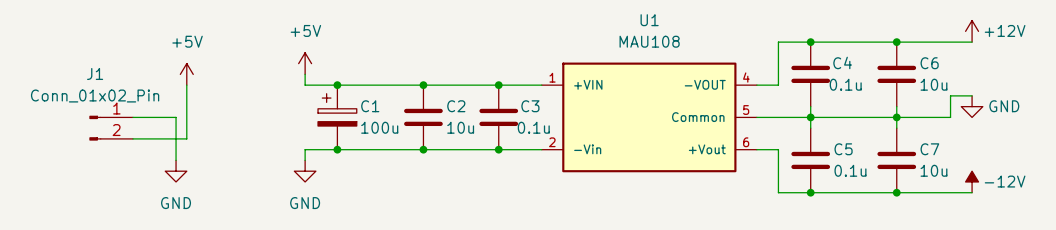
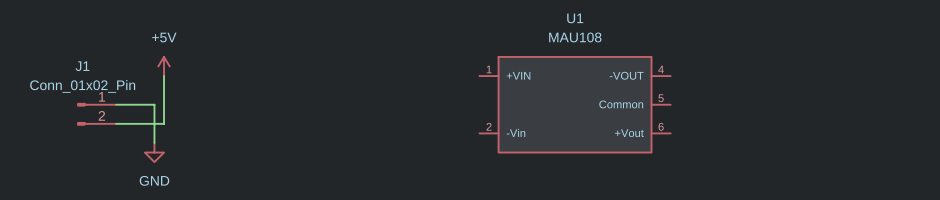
power symbol: +12V (972, 31) -> none
junction: (810, 42) -> none
junction: (896, 42) -> none
wire: (972, 42) (778, 42) (778, 85) (756, 85) -> none
power symbol: +5V (305, 63) -> none
wire: (305, 74) (305, 85) (541, 85) -> none
C4: 0.1u (810, 74) -> none
C6: 10u (896, 74) -> none
junction: (337, 85) -> none
junction: (423, 85) -> none
junction: (498, 85) -> none
wire: (972, 95) (950, 95) (950, 117) (756, 117) -> none
wire: (810, 106) (810, 128) -> none
wire: (896, 106) (896, 128) -> none
power symbol: GND (972, 106) -> none
C1: 100u (337, 117) -> none
C2: 10u (423, 117) -> none
C3: 0.1u (498, 117) -> none
junction: (810, 117) -> none
junction: (896, 117) -> none
junction: (337, 149) -> none
junction: (423, 149) -> none
junction: (498, 149) -> none
wire: (541, 149) (305, 149) (305, 160) -> none
wire: (756, 149) (778, 149) (778, 192) (972, 192) -> none
C5: 0.1u (810, 160) -> none
C7: 10u (896, 160) -> none
power symbol: GND (305, 171) -> none
power symbol: -12V (972, 181) -> none
junction: (810, 192) -> none
junction: (896, 192) -> none

